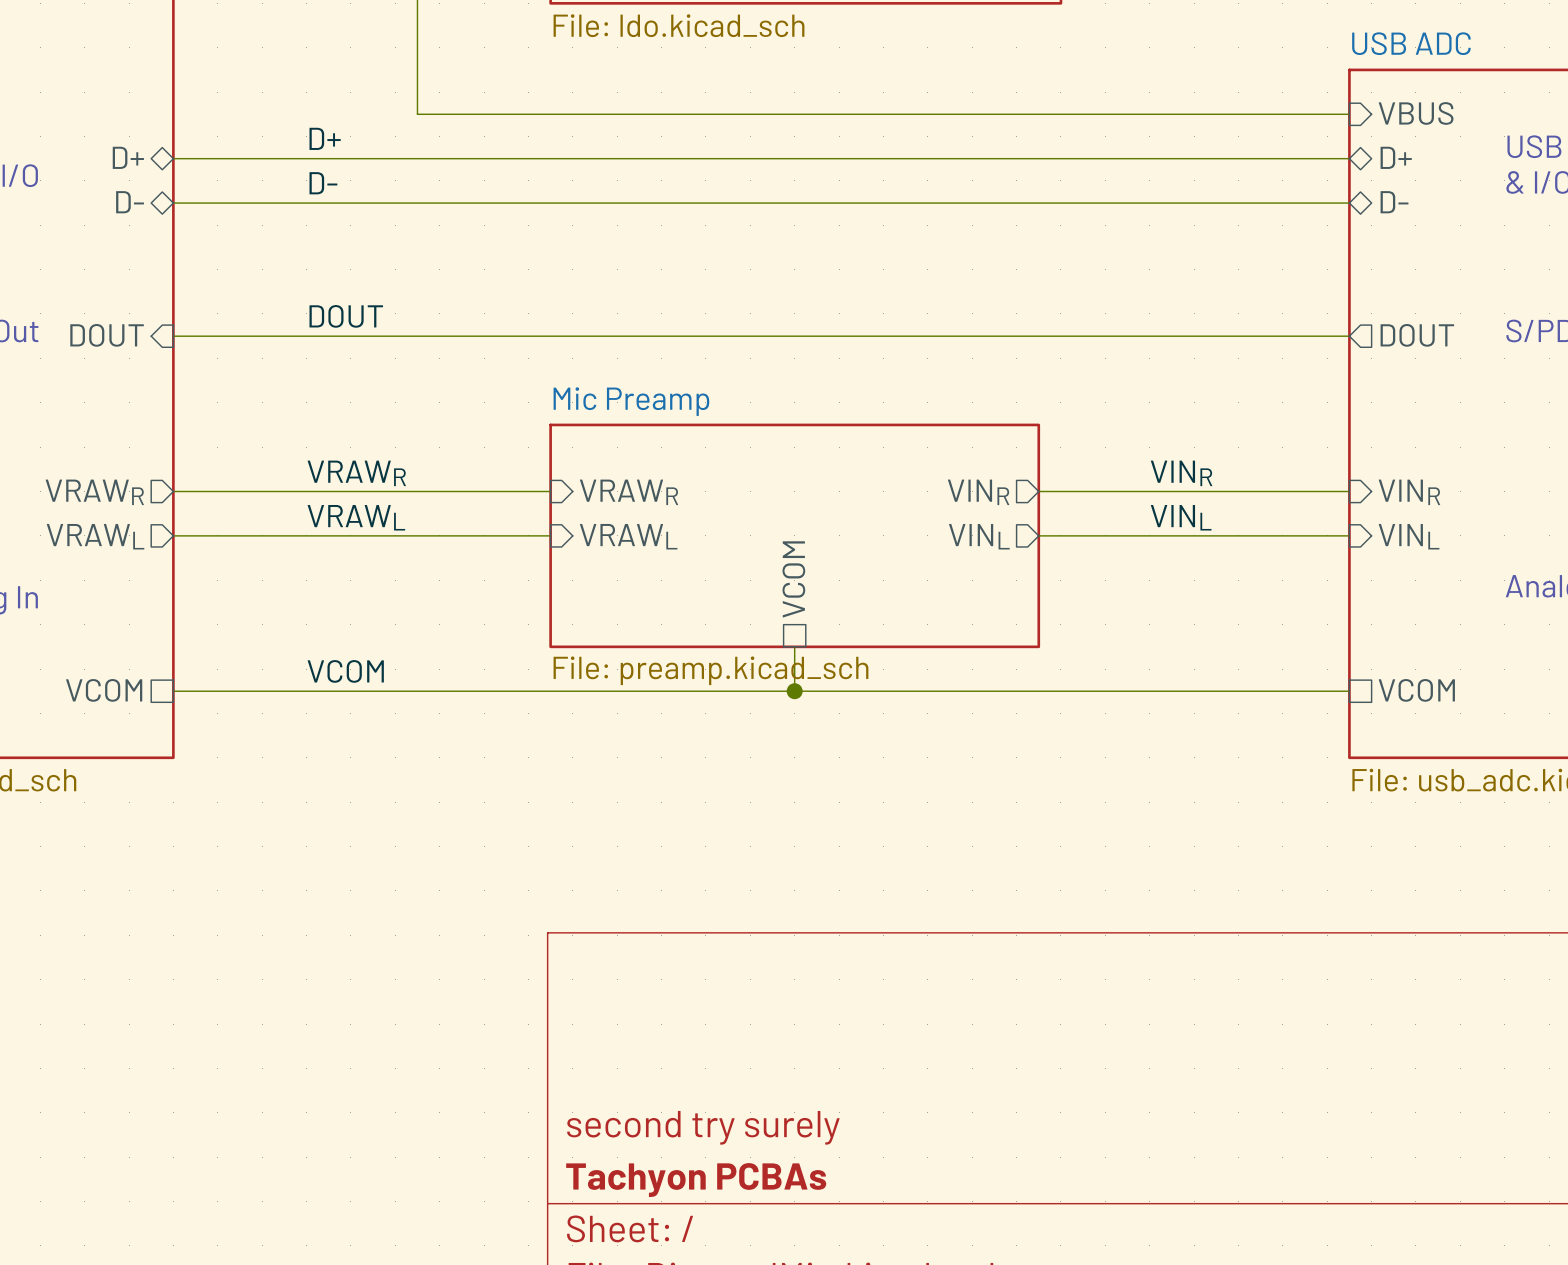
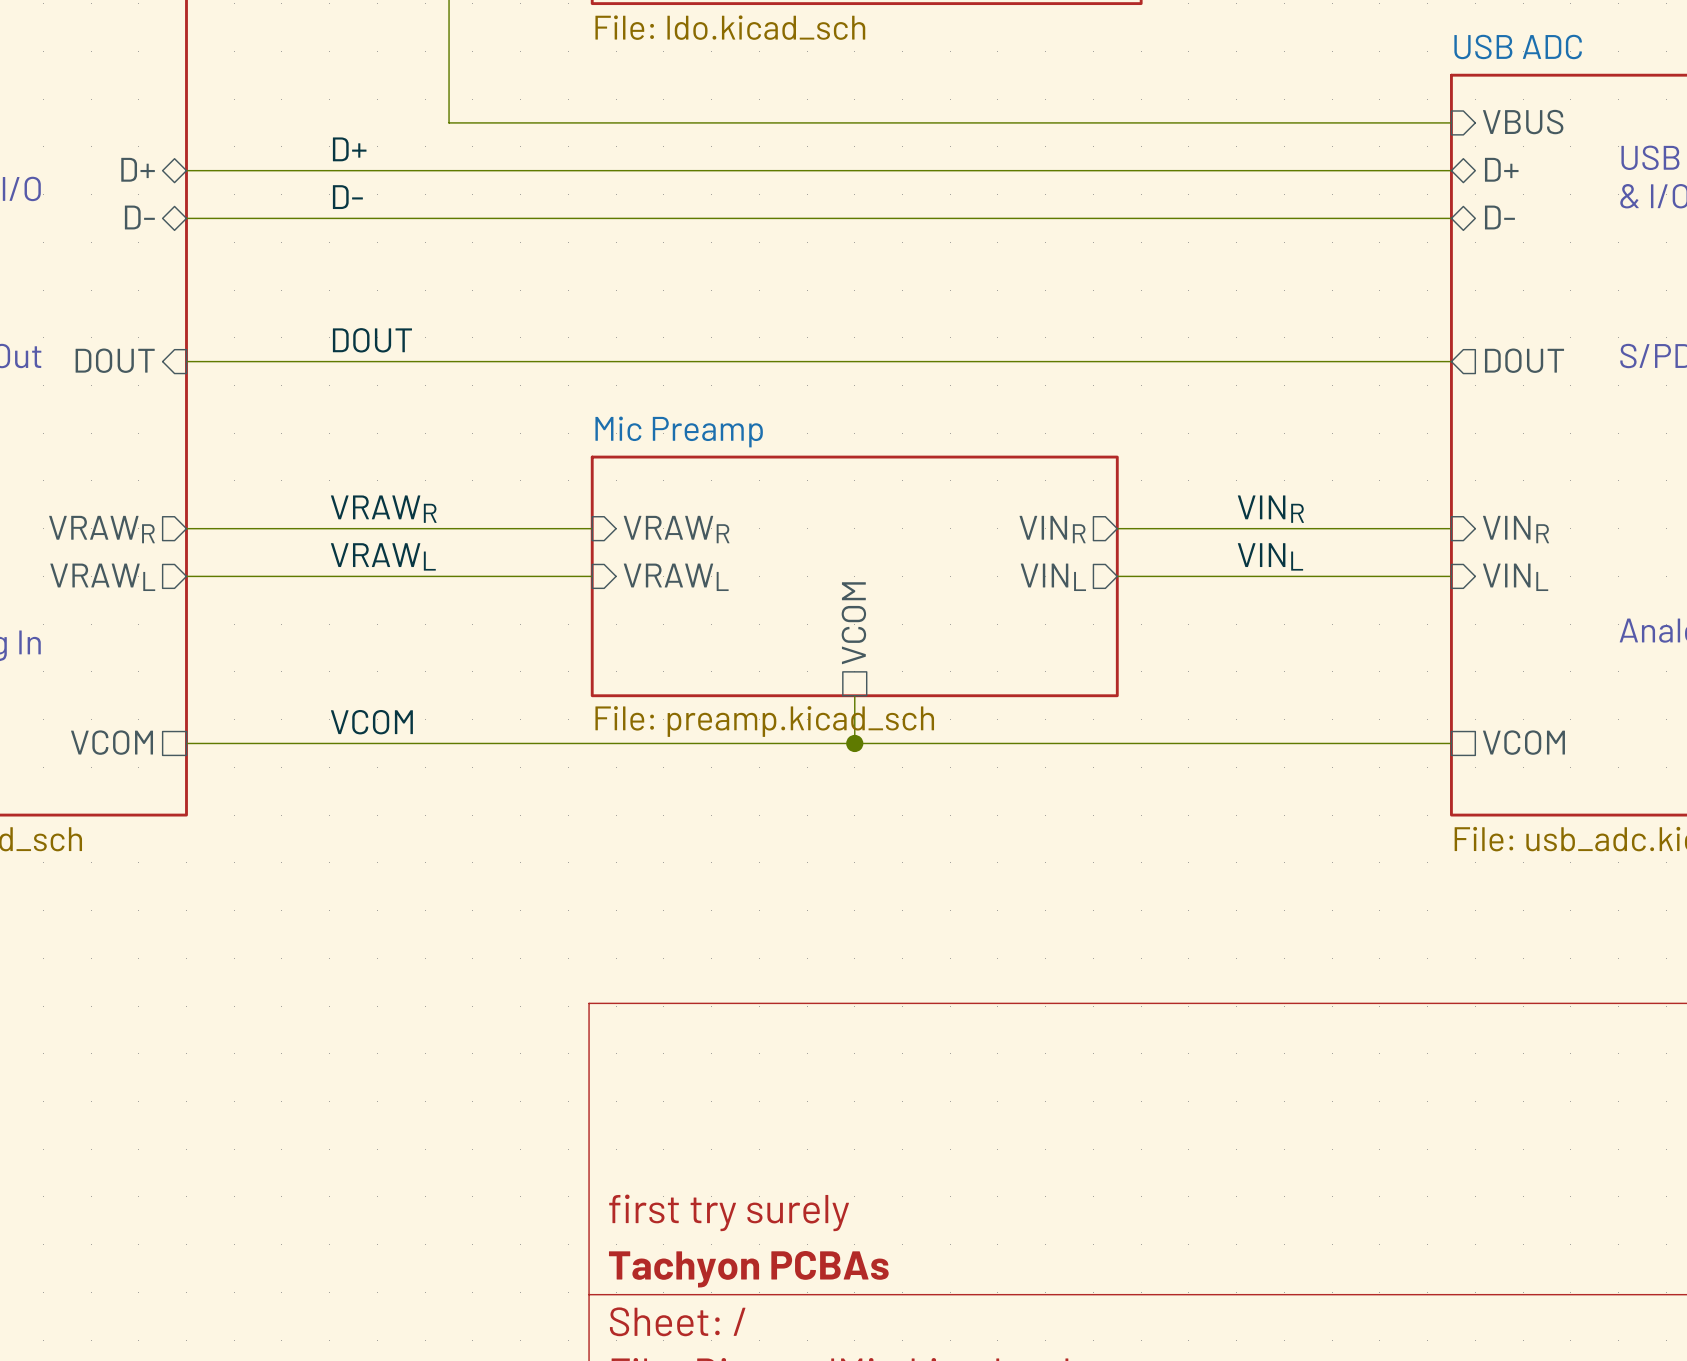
title block: second try surely (703, 1127) -> first try surely (729, 1212)

